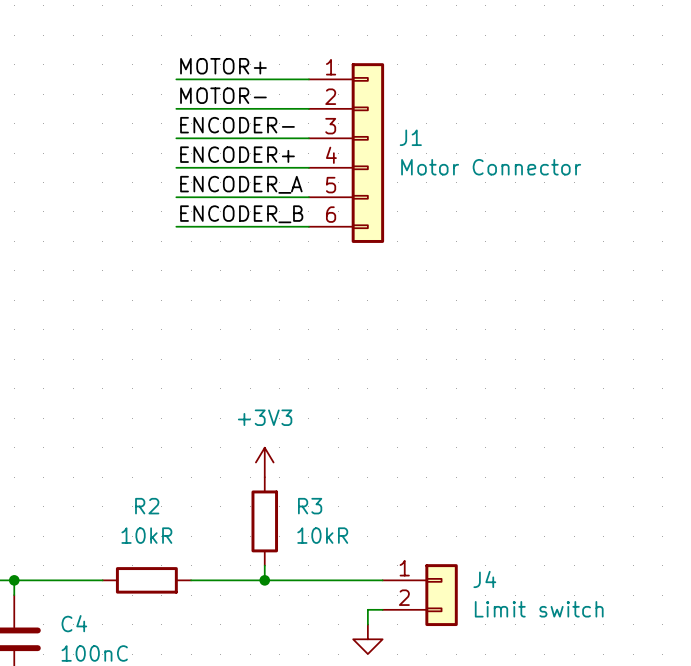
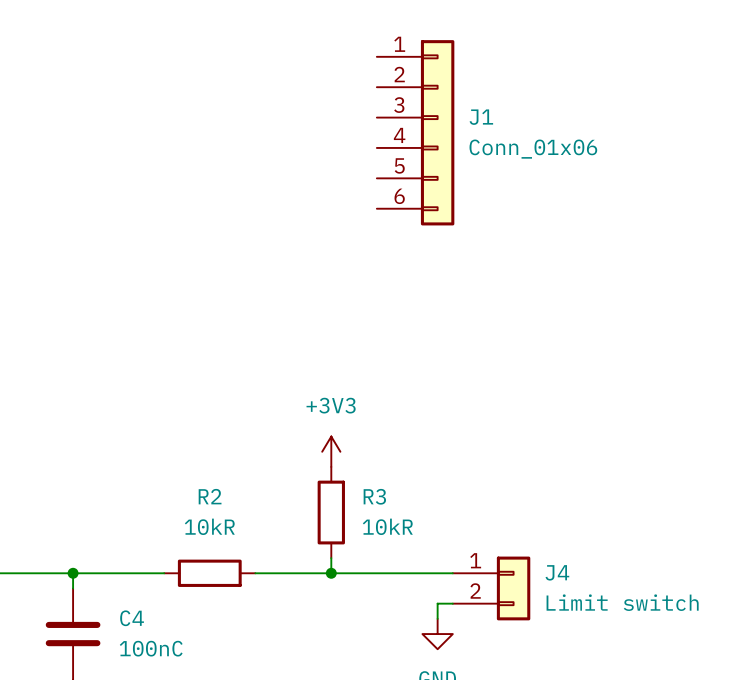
label: MOTOR+ (223, 66) -> none
wire: (176, 79) (308, 79) -> none
label: MOTOR- (223, 95) -> none
wire: (176, 108) (308, 108) -> none
label: ENCODER- (237, 125) -> none
wire: (176, 138) (308, 138) -> none
label: ENCODER+ (237, 154) -> none
wire: (176, 167) (308, 167) -> none
J1 value: Motor Connector (491, 167) -> Conn_01x06 (533, 149)
label: ENCODER_A (241, 184) -> none
wire: (176, 197) (308, 197) -> none
label: ENCODER_B (241, 214) -> none
wire: (176, 226) (308, 226) -> none

